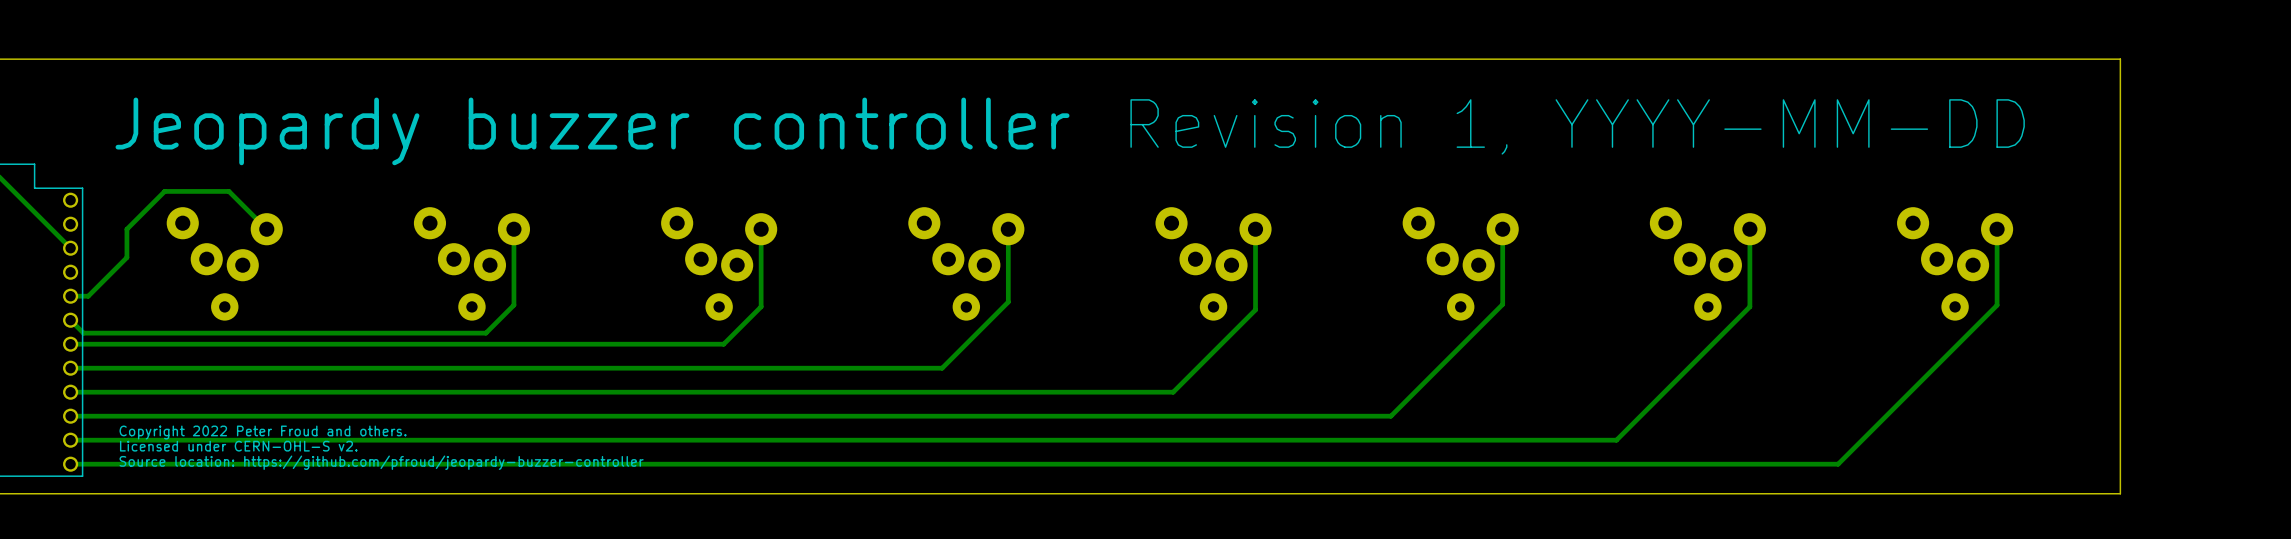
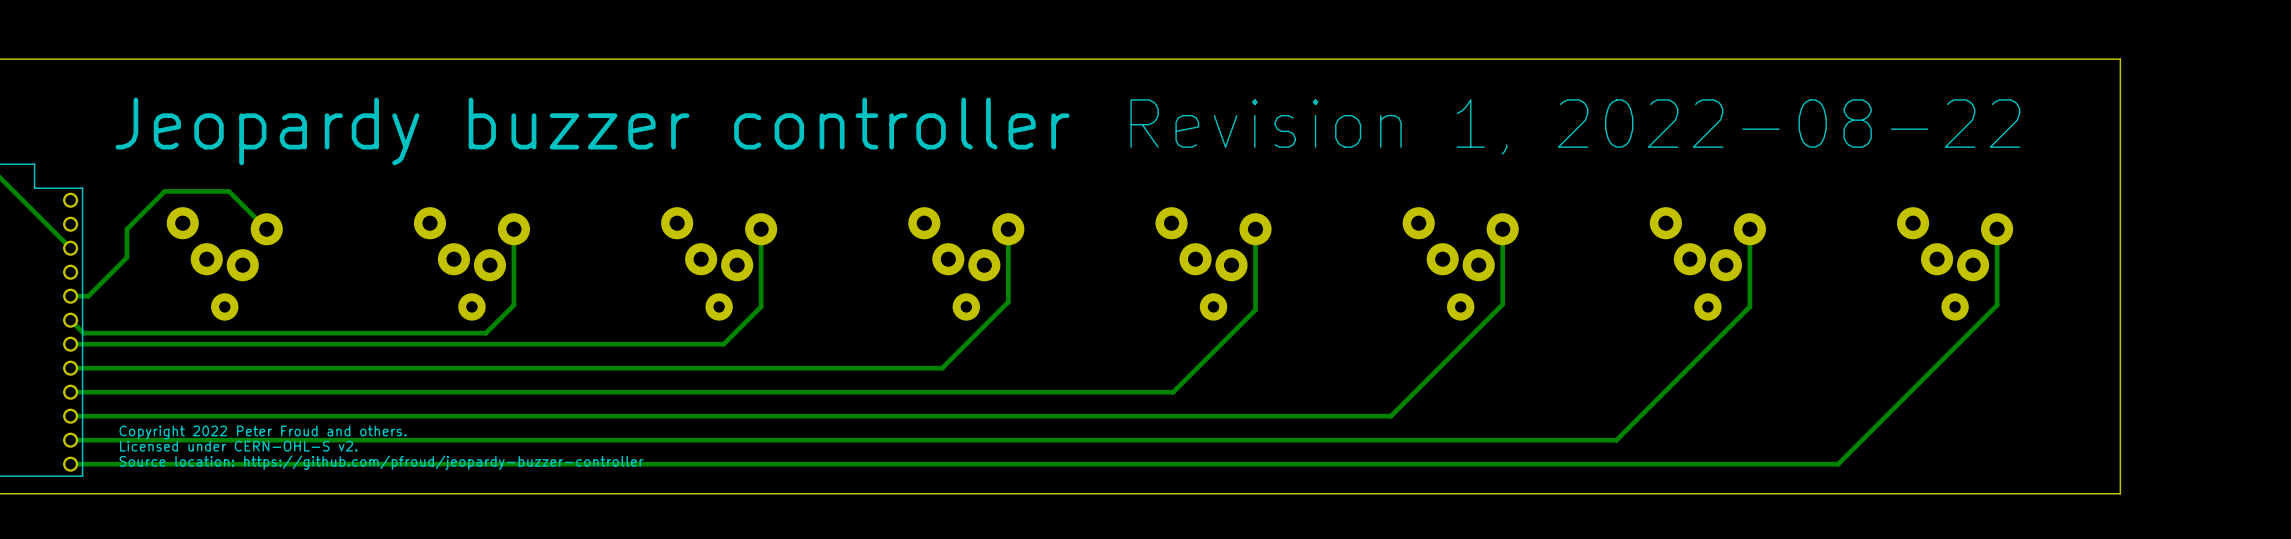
text: Revision 1, YYYY-MM-DD (1577, 126) -> Revision 1, 2022-08-22 (1575, 126)

